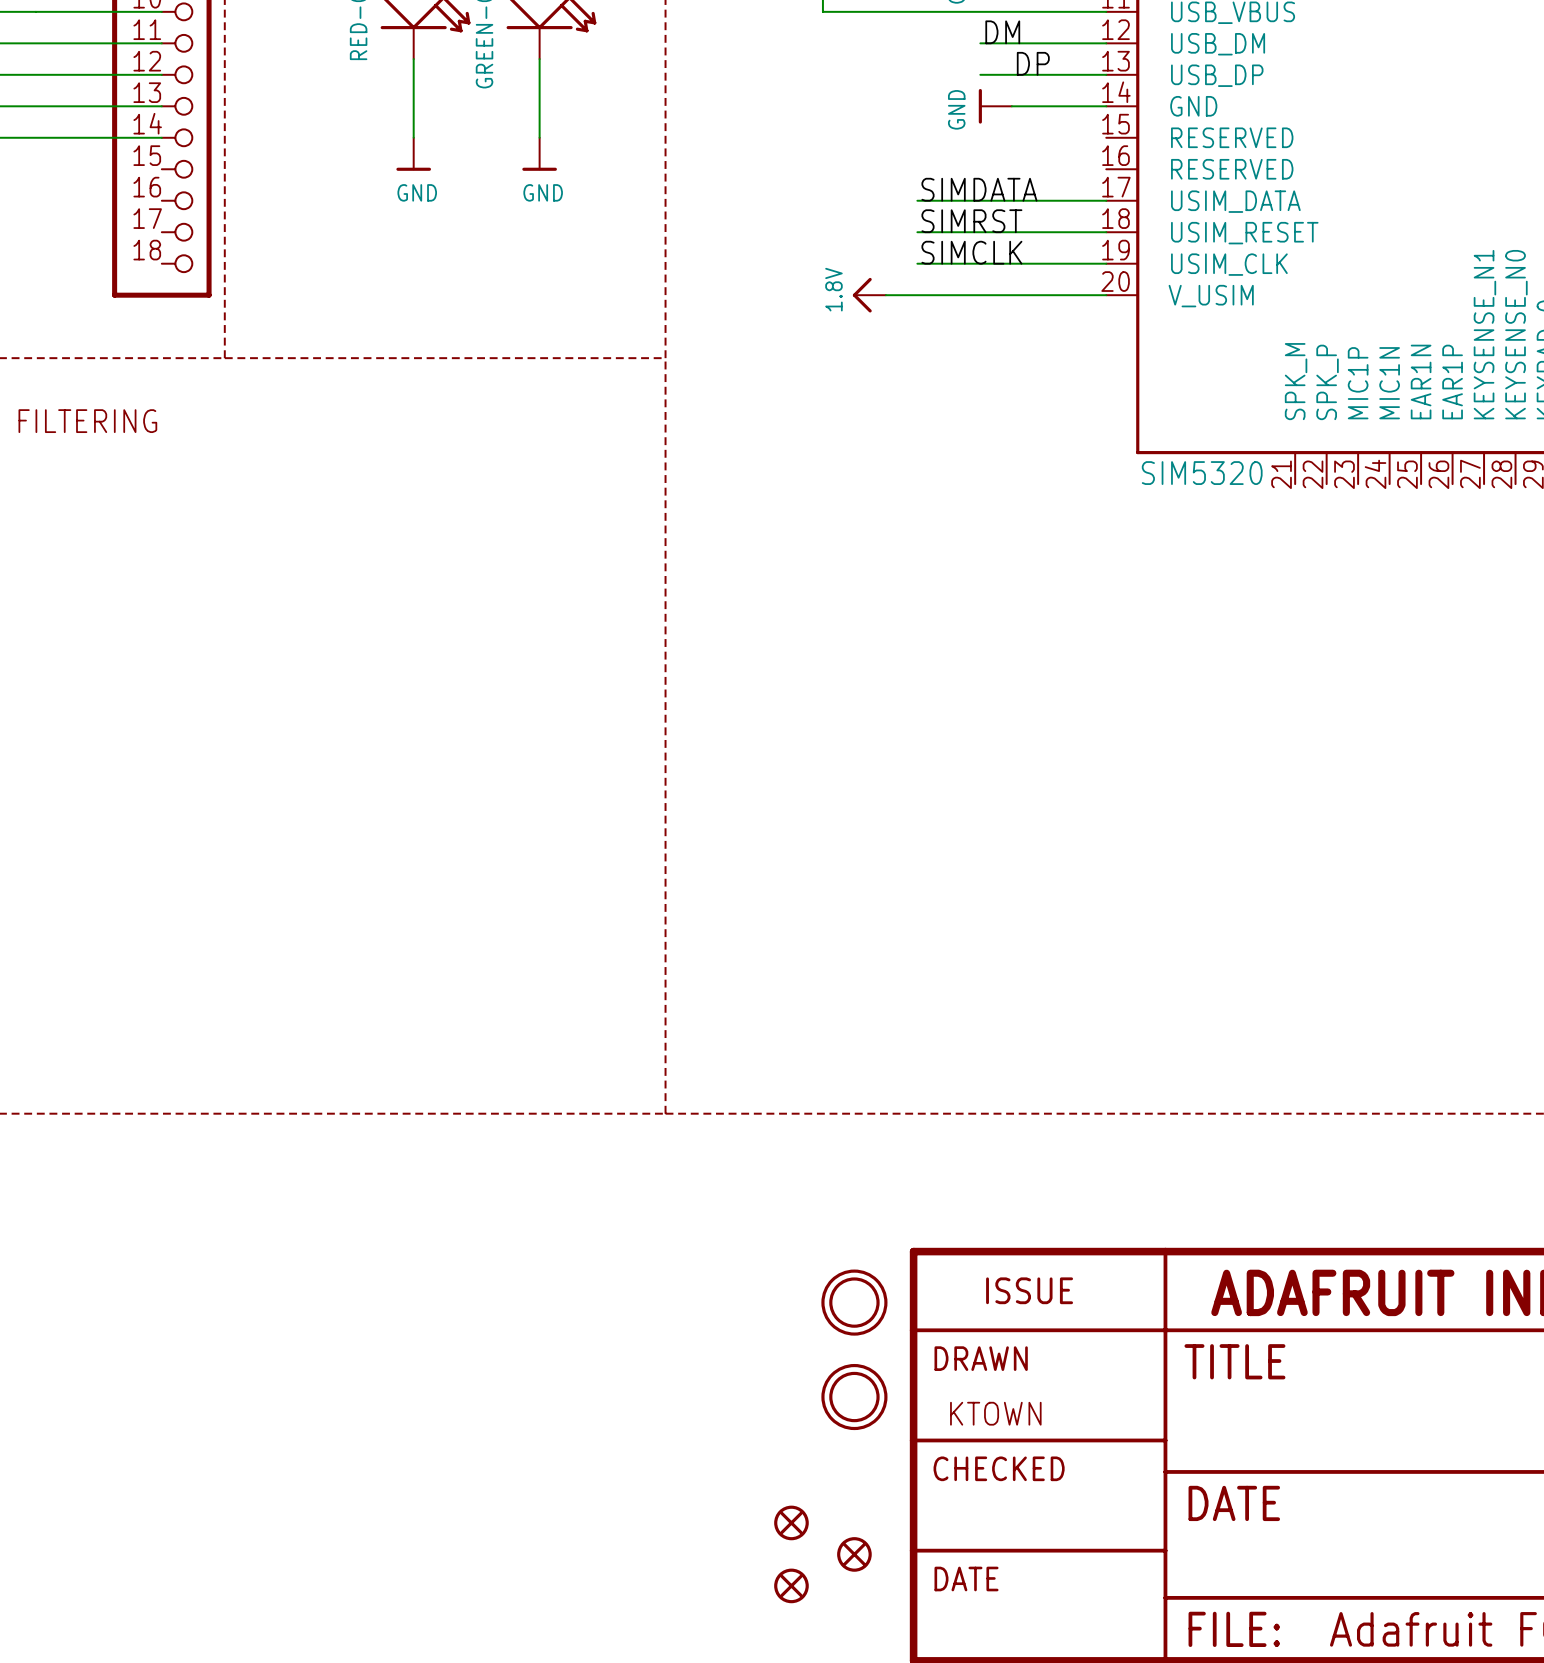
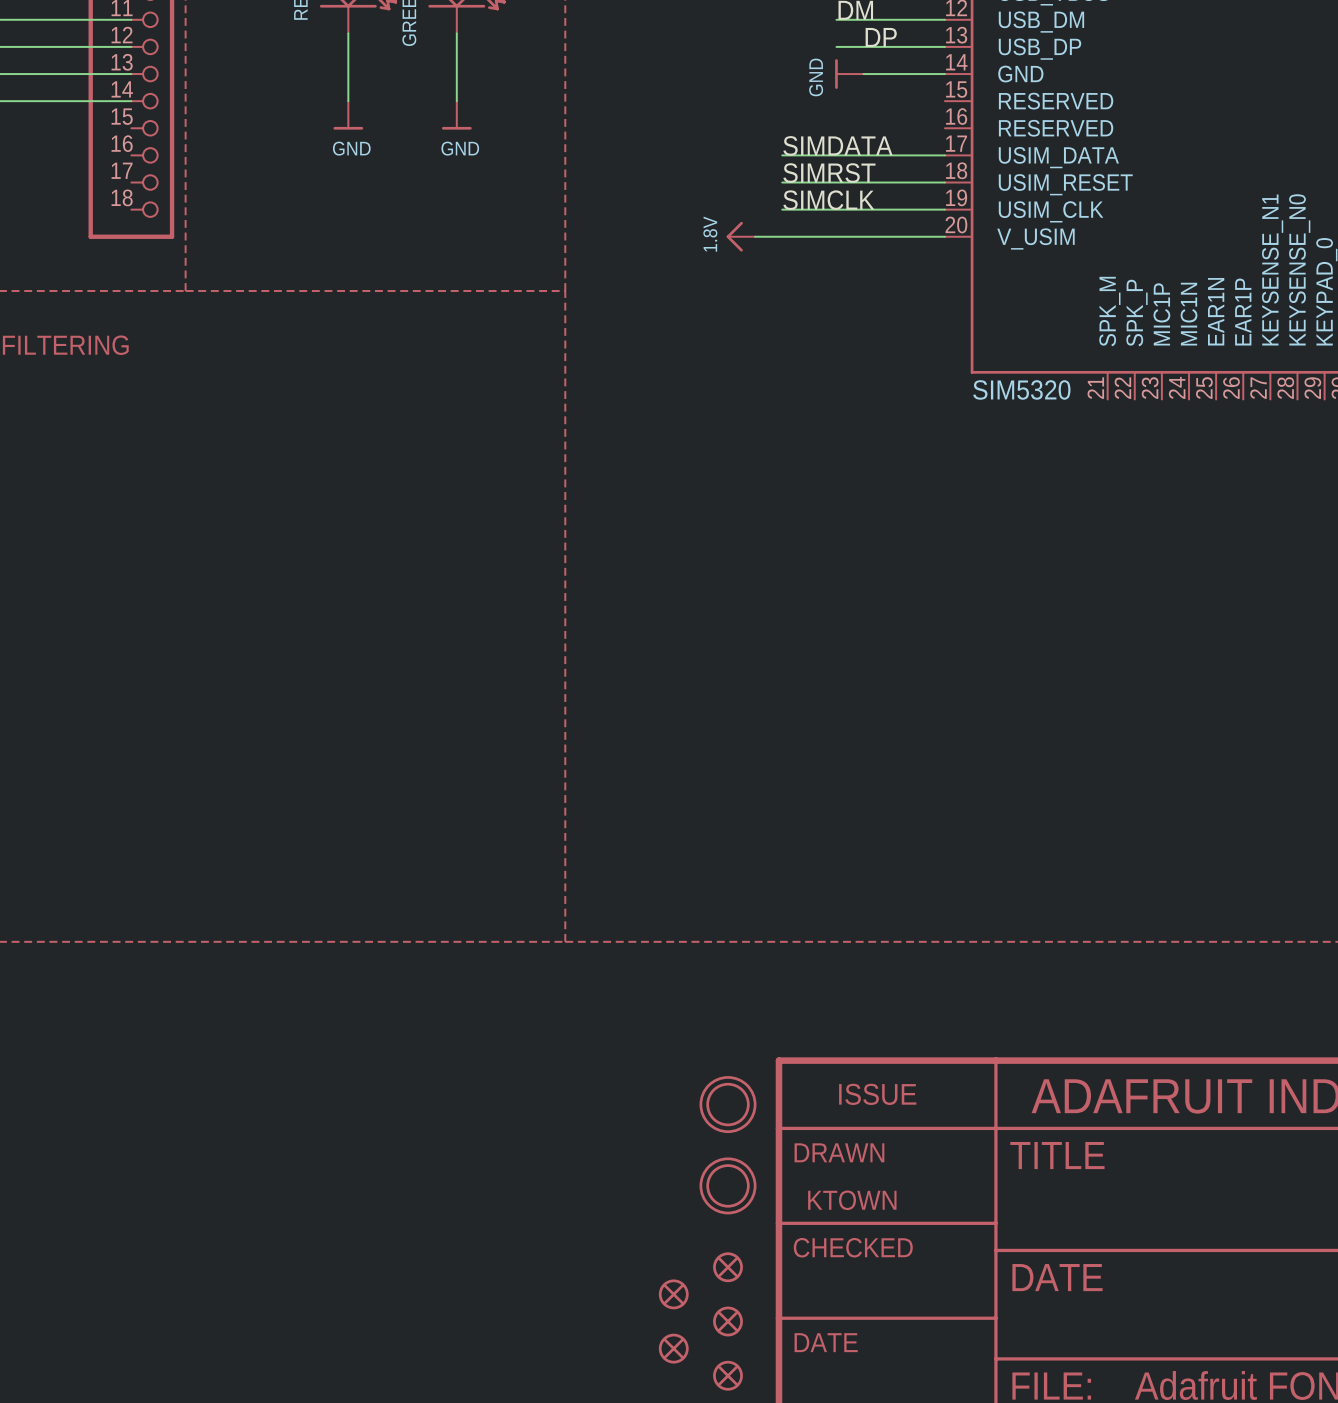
part: none -> (727, 1267)
part: none -> (727, 1375)

